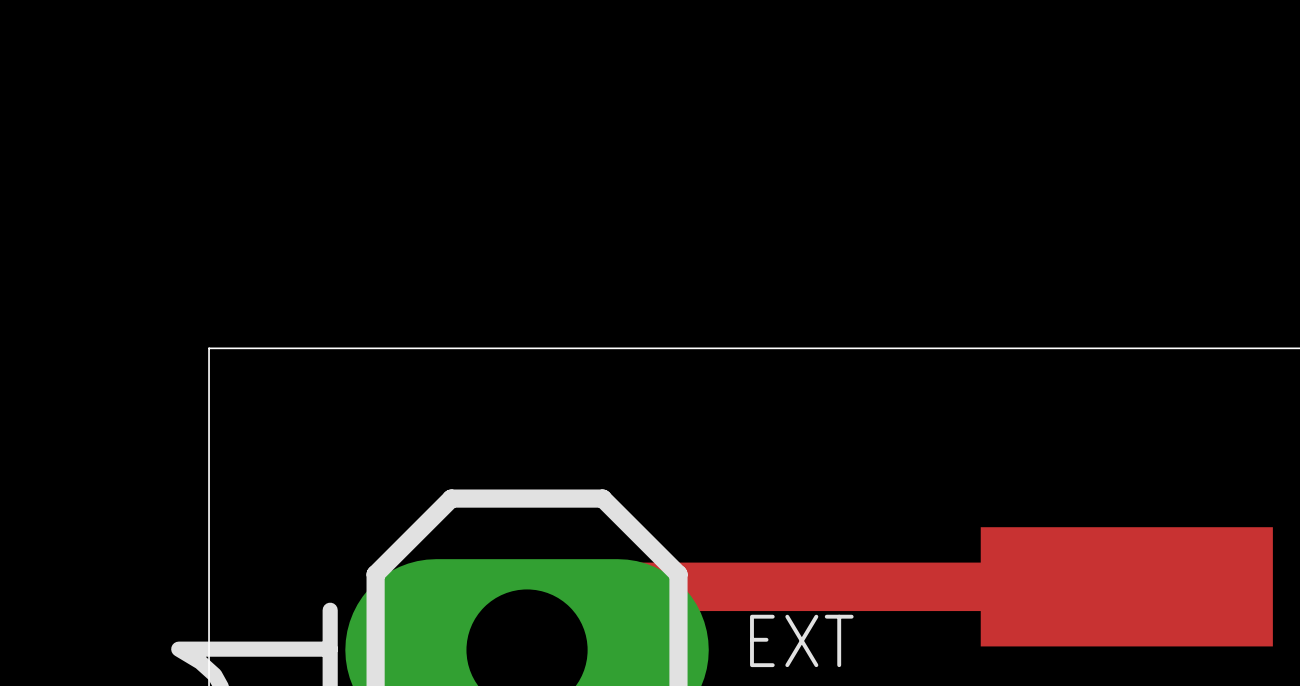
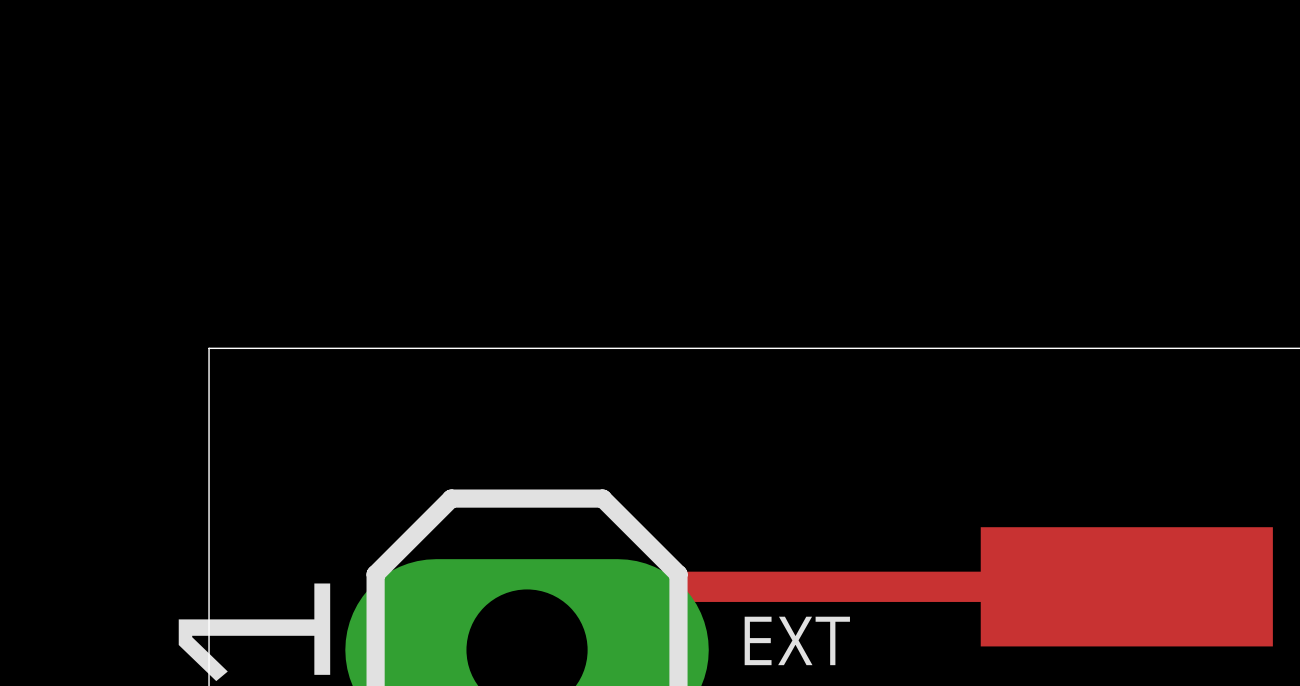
track width: thick (1126, 586) (590, 586) (527, 650) -> thin (1126, 586) (590, 586) (527, 650)

